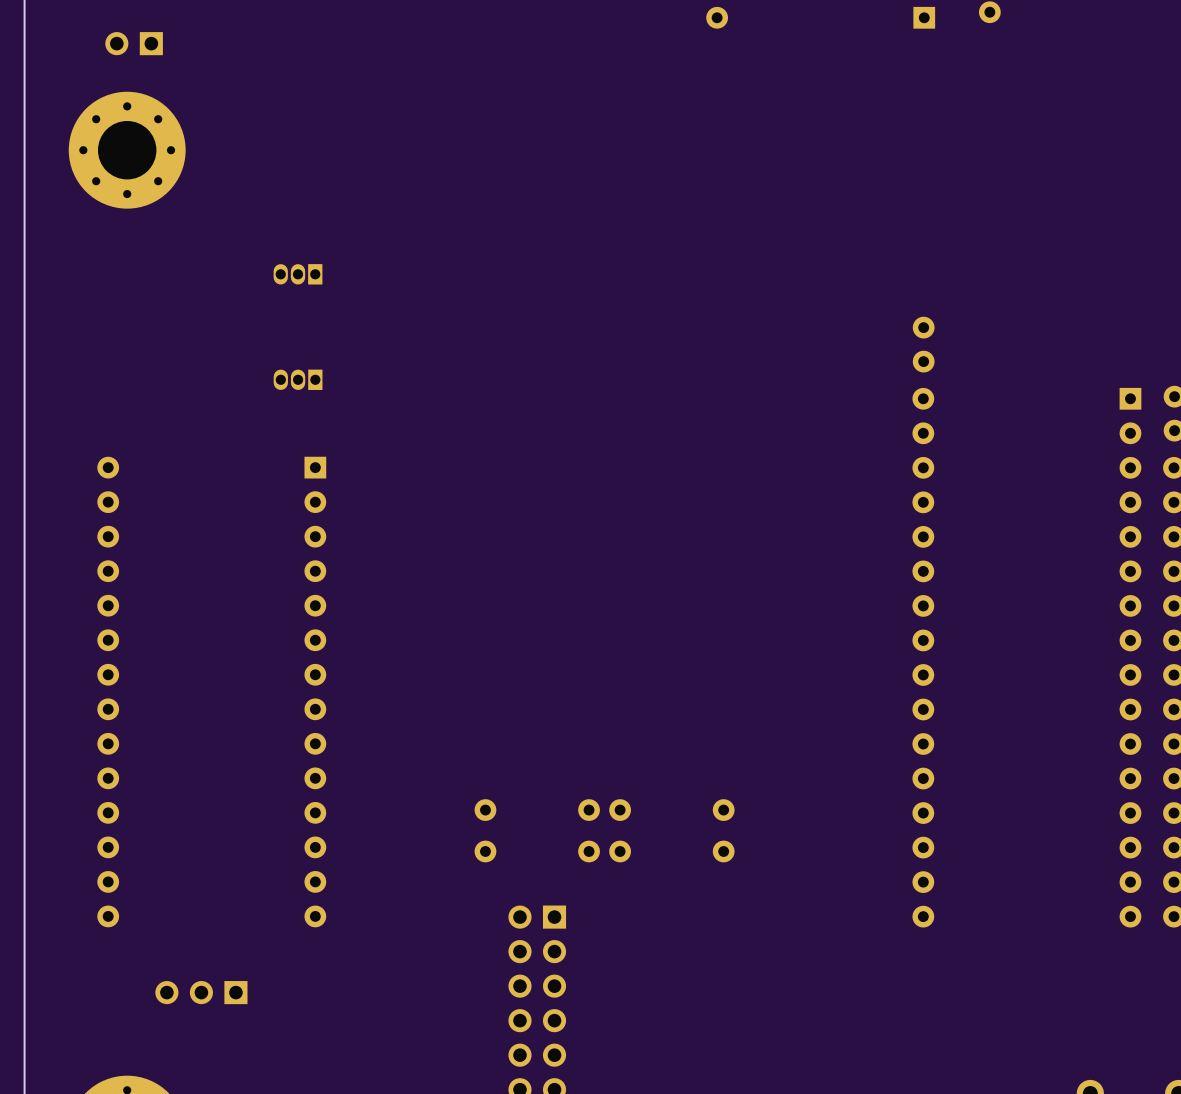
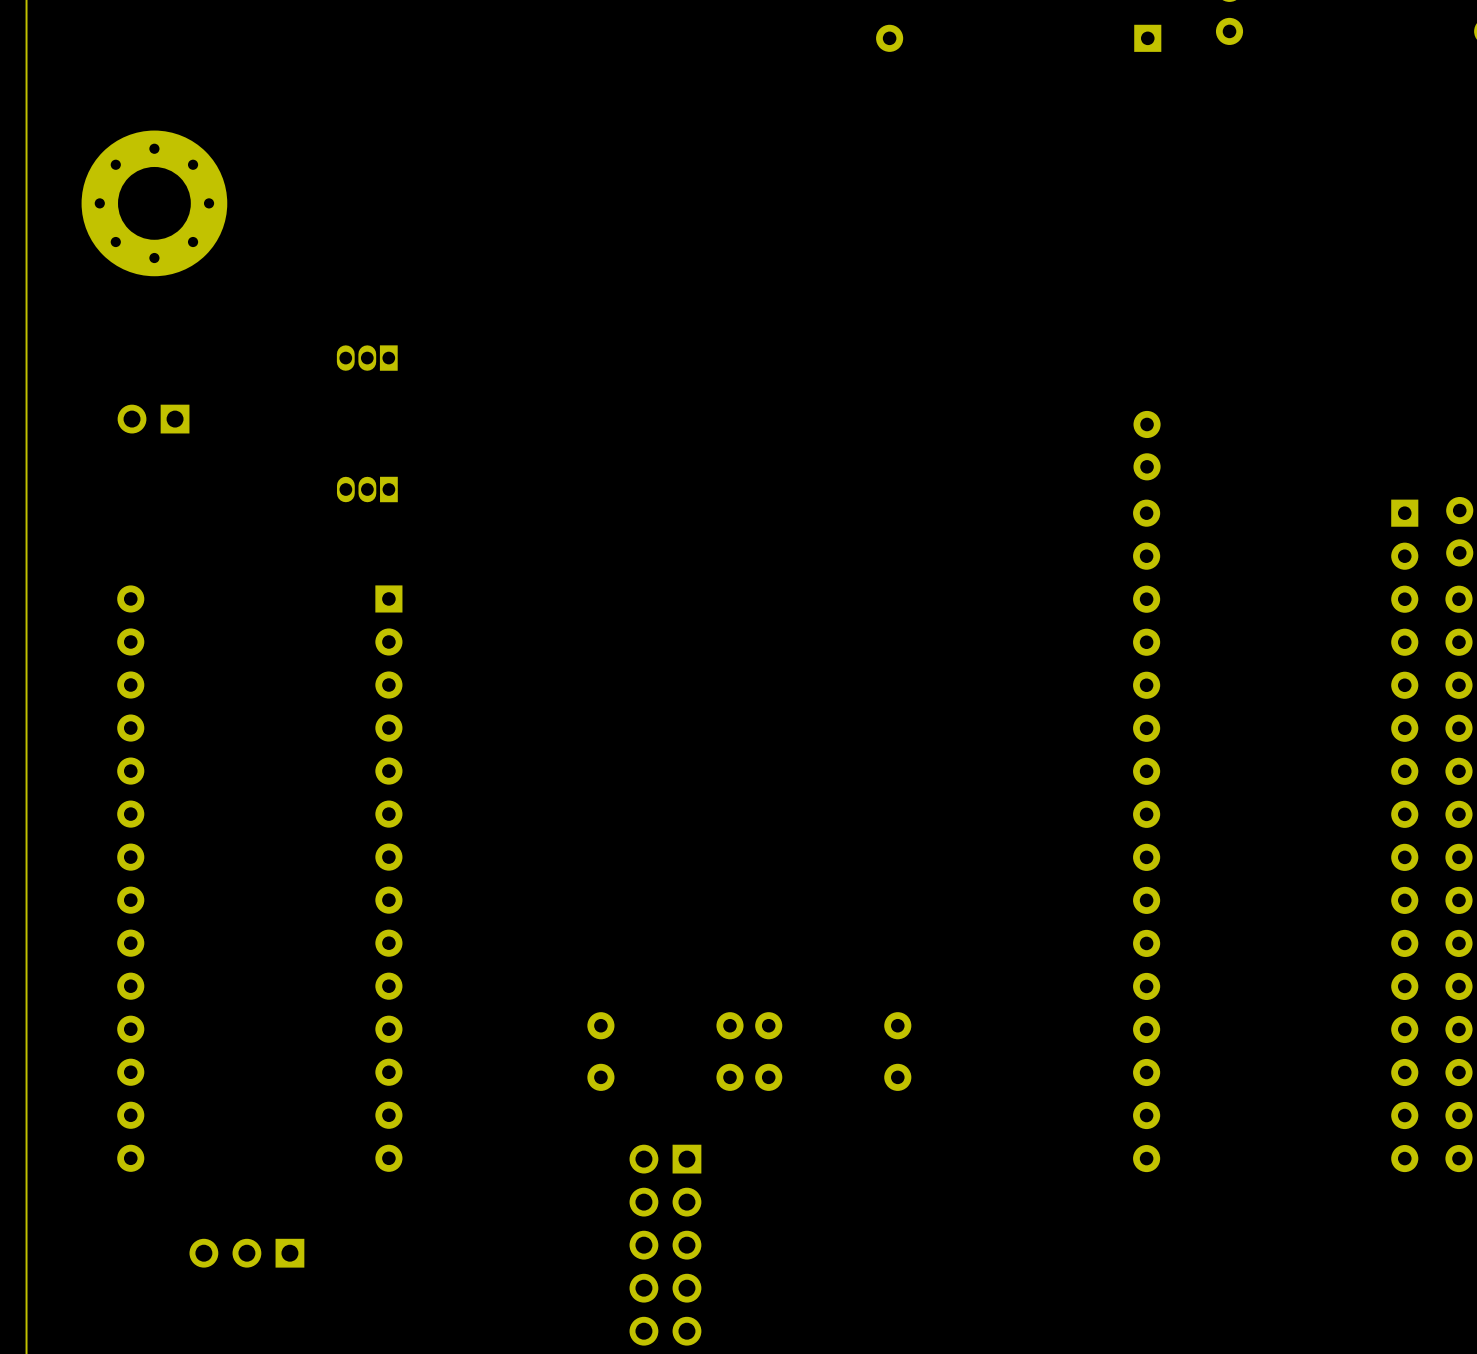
part position: (134, 43) -> (153, 419)

